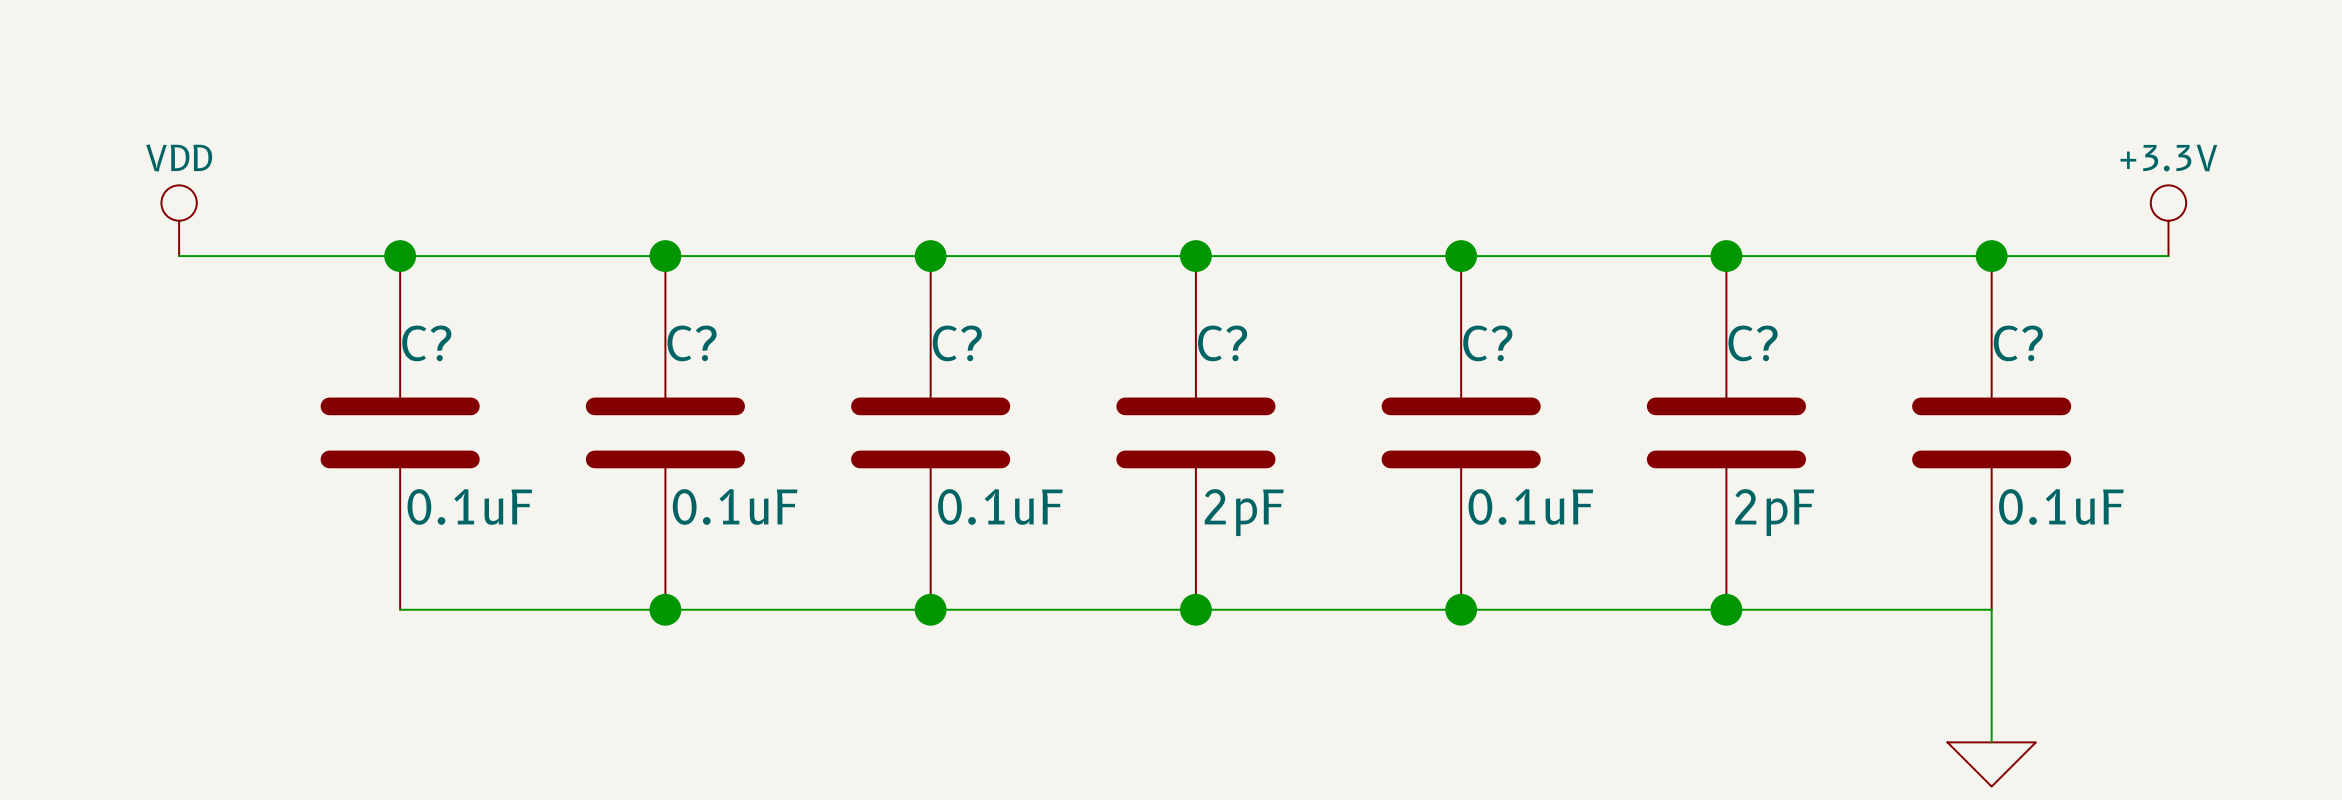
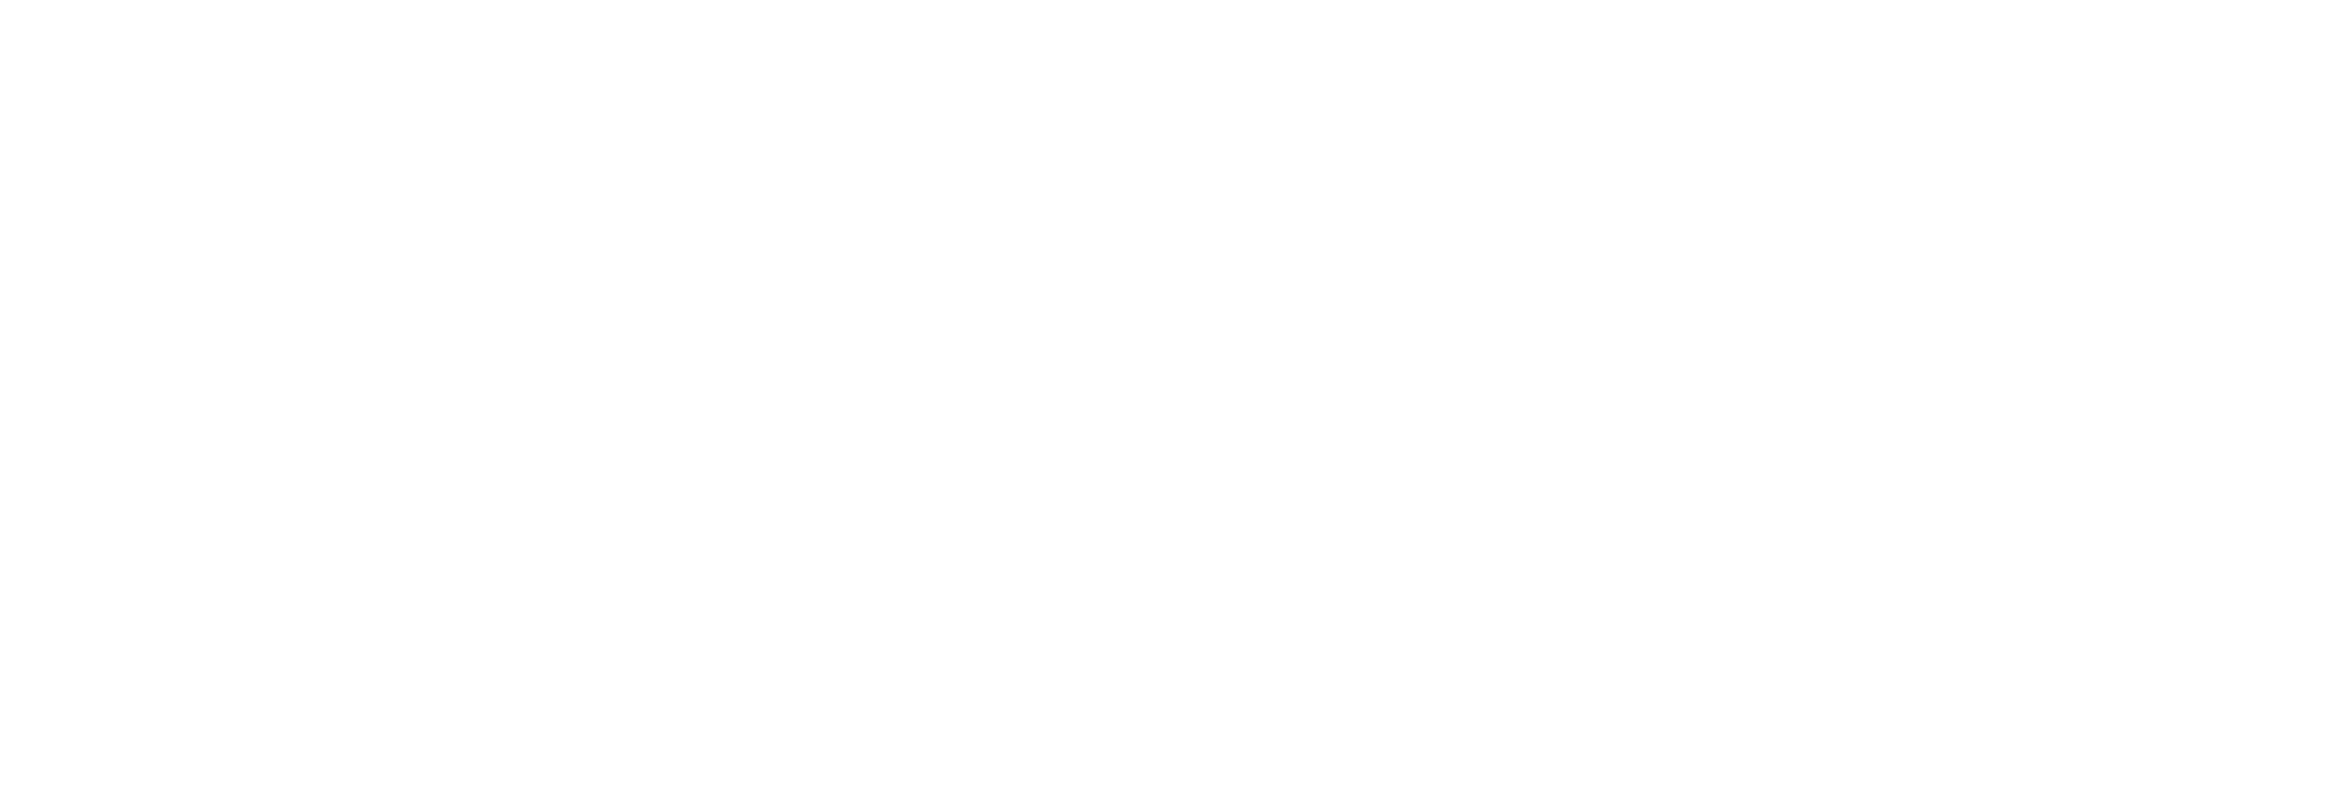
power symbol: VDD (179, 220) -> none
power symbol: +3.3V (2168, 220) -> none
wire: (179, 256) (2168, 256) -> none
junction: (400, 256) -> none
junction: (665, 256) -> none
junction: (930, 256) -> none
junction: (1195, 256) -> none
junction: (1461, 256) -> none
junction: (1726, 256) -> none
junction: (1991, 256) -> none
C?: 0.1uF (400, 432) -> none
C?: 0.1uF (665, 432) -> none
C?: 0.1uF (930, 432) -> none
C?: 2pF (1195, 432) -> none
C?: 0.1uF (1461, 432) -> none
C?: 2pF (1726, 432) -> none
C?: 0.1uF (1991, 432) -> none
wire: (400, 609) (1991, 609) (1991, 742) -> none
junction: (665, 609) -> none
junction: (930, 609) -> none
junction: (1195, 609) -> none
junction: (1461, 609) -> none
junction: (1726, 609) -> none
power symbol: (1991, 764) -> none

